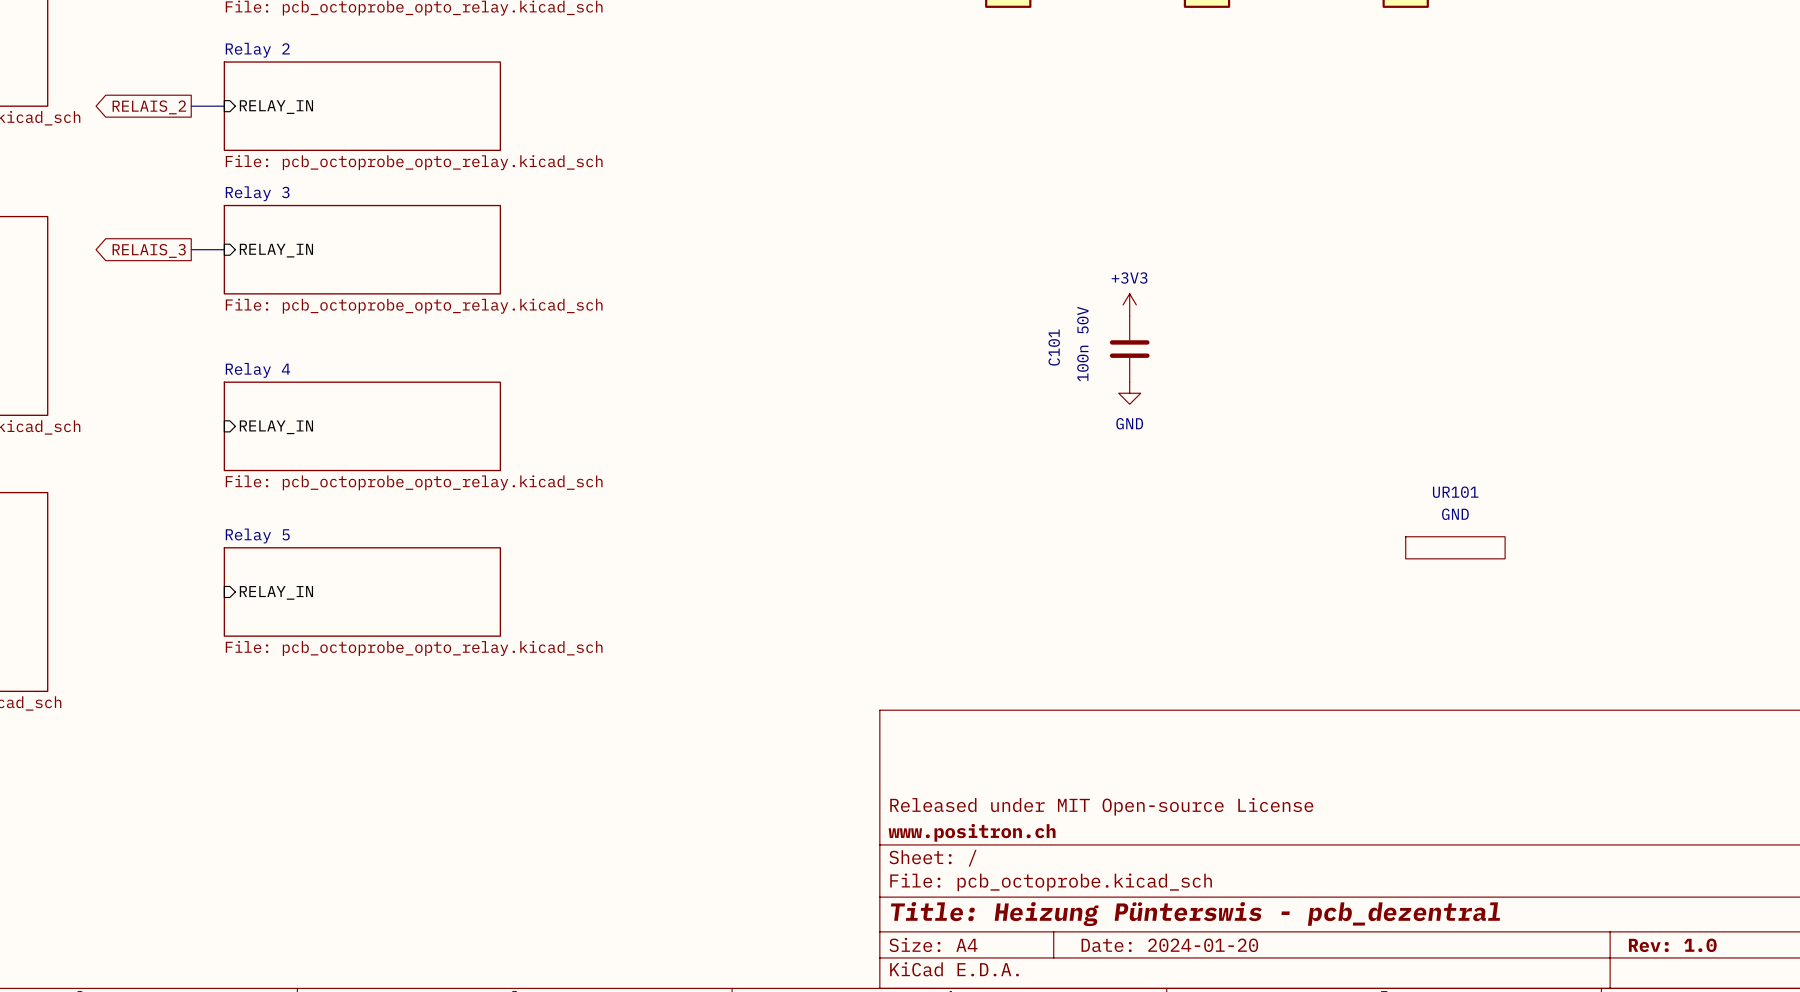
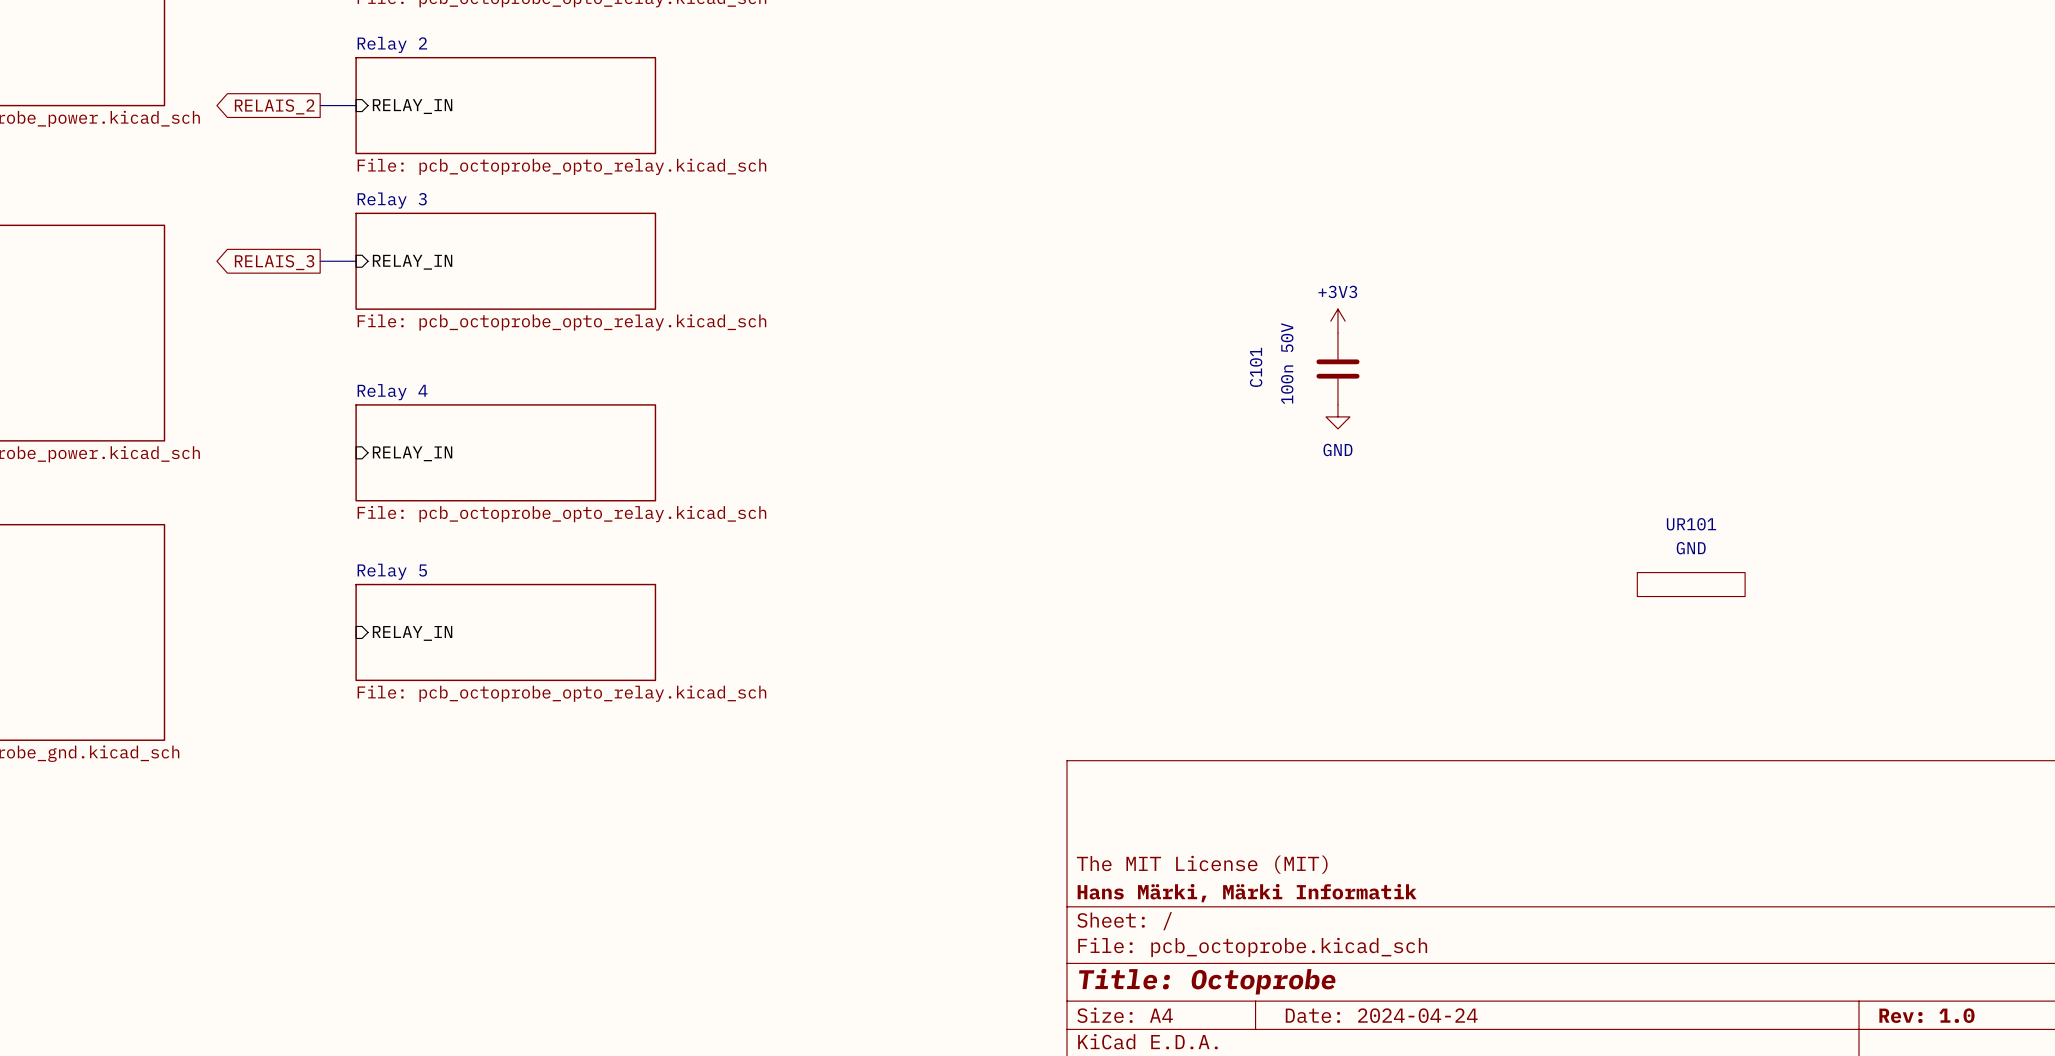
title block: Released under MIT Open-source License (1101, 806) -> The MIT License (MIT) (1202, 864)
title block: www.positron.ch (972, 832) -> Hans Märki, Märki Informatik (1247, 893)
title block: Title: Heizung Pünterswis - pcb_dezentral (1195, 914) -> Title: Octoprobe (1207, 981)
title block: Date: 2024-01-20 (1169, 945) -> Date: 2024-04-24 (1381, 1015)

